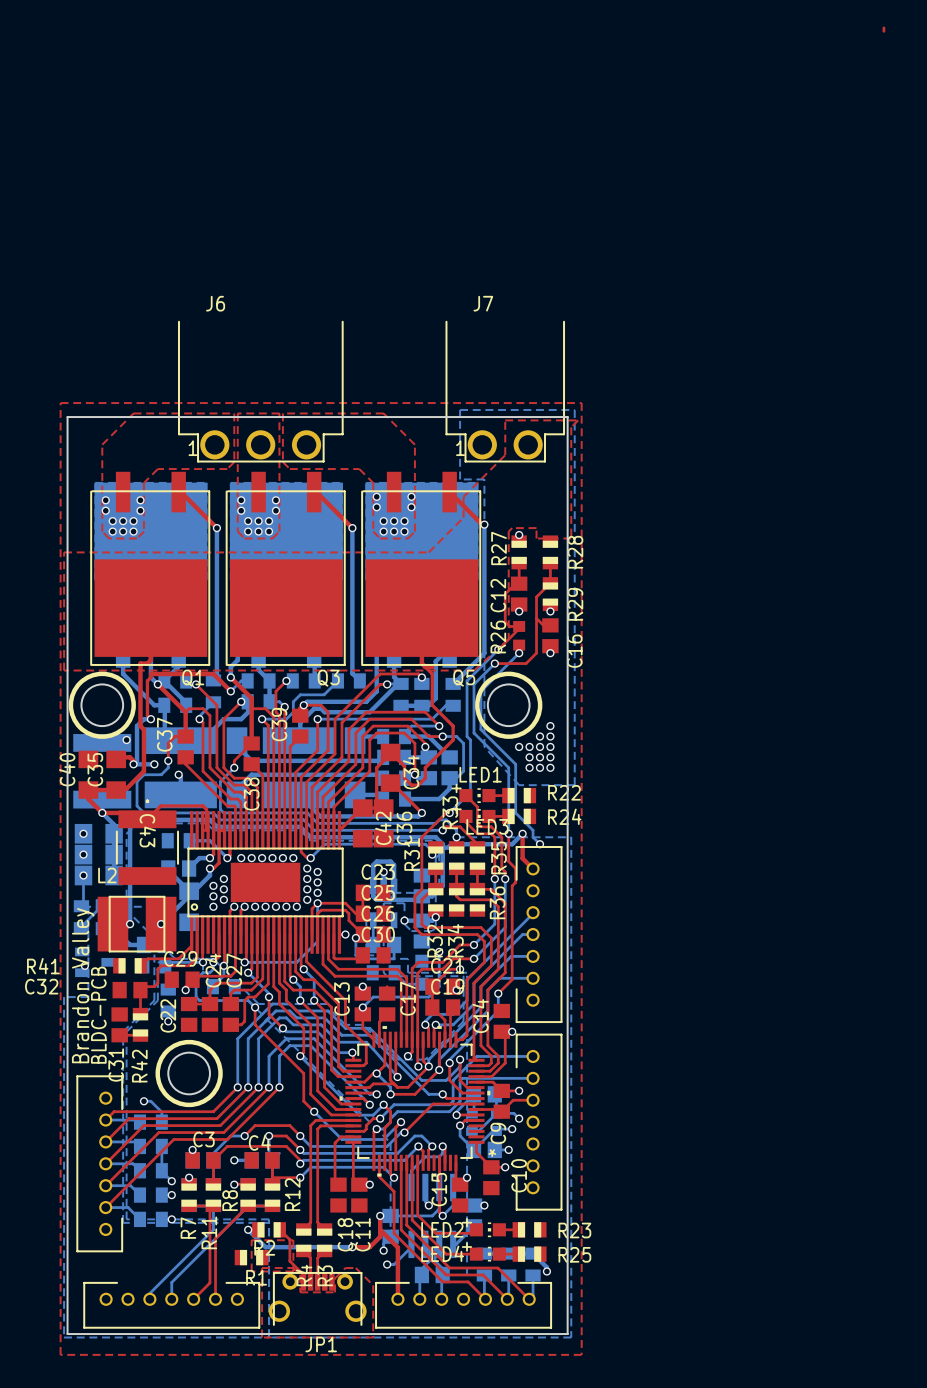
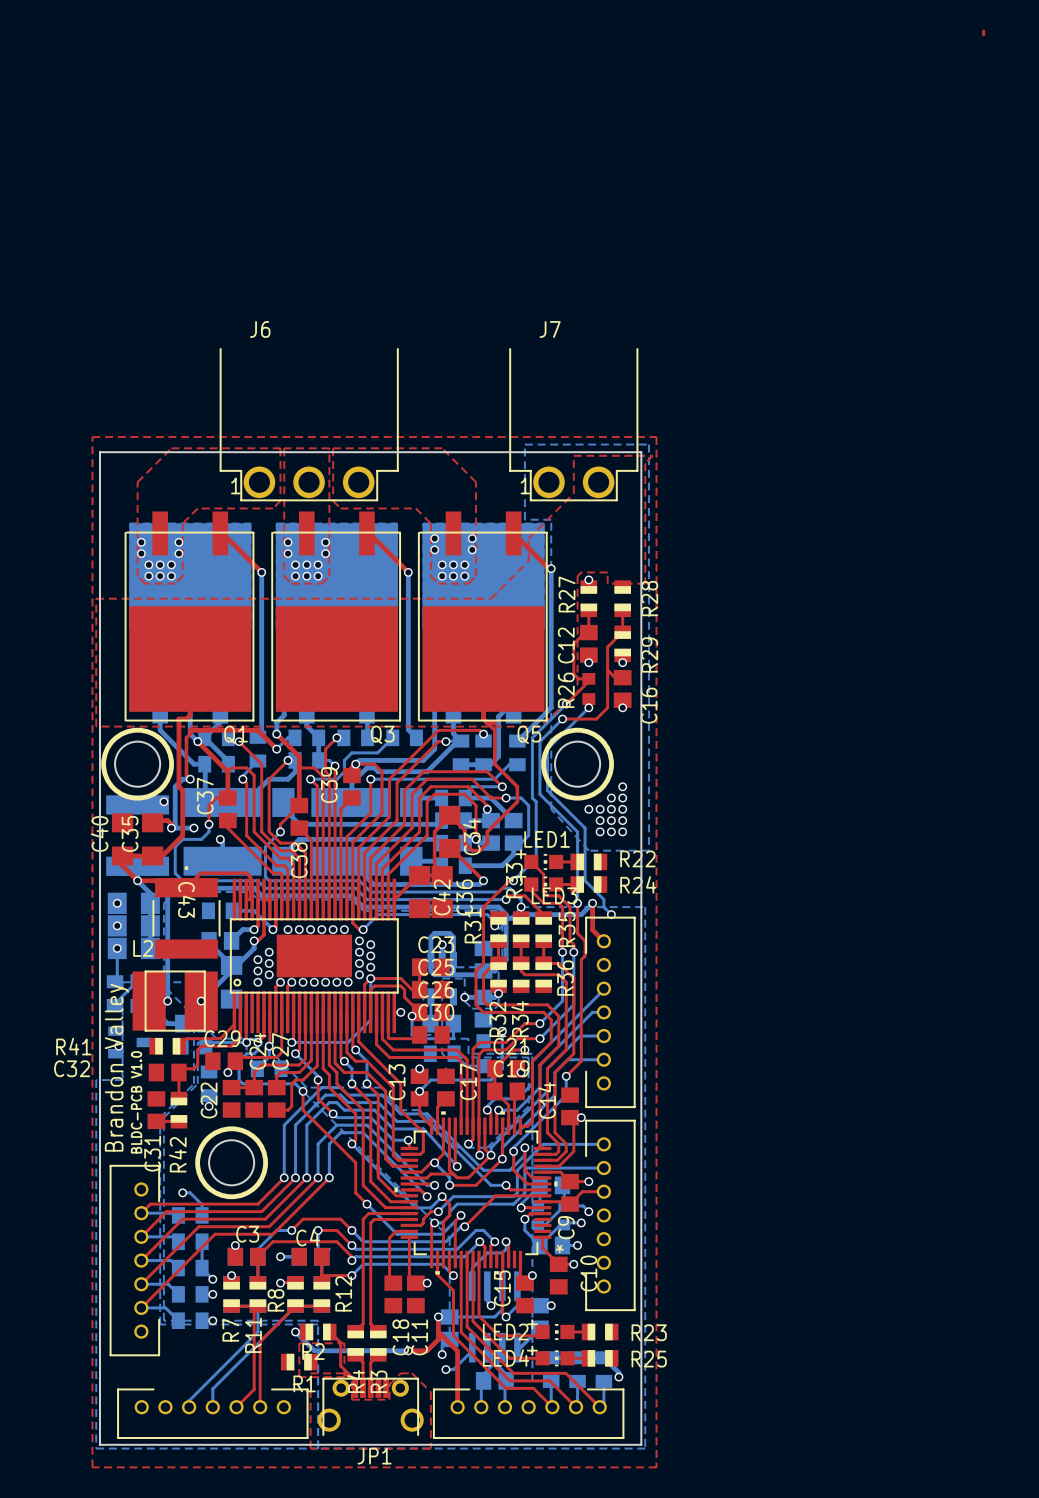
text: BLDC-PCB (98, 1015) -> BLDC-PCB V1.0 (136, 1102)

